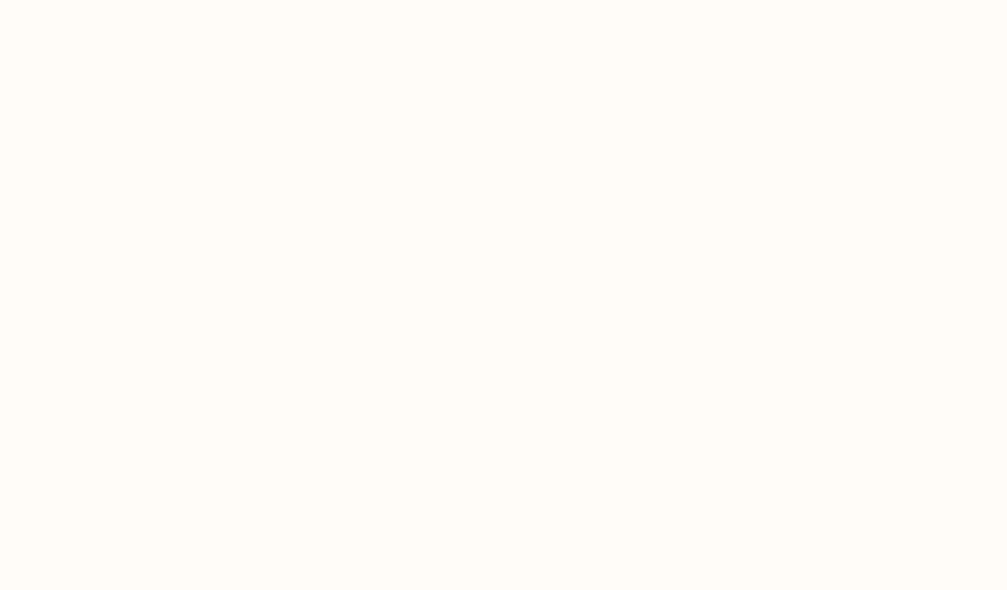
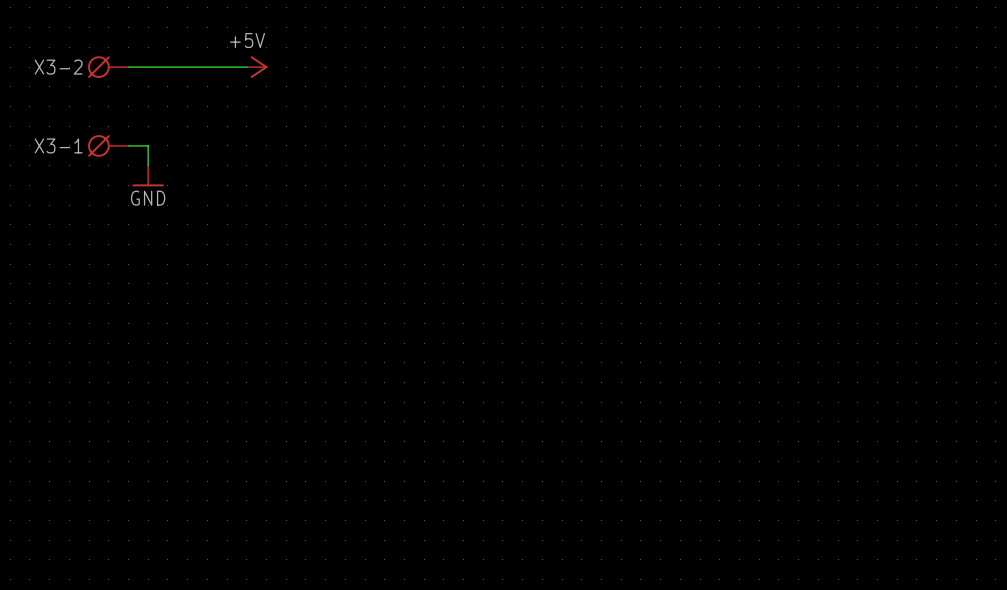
X3-2: none -> (108, 67)
wire: none -> (128, 67) (246, 67)
power symbol: none -> +5V (257, 67)
X3-1: none -> (108, 145)
wire: none -> (128, 145) (148, 145) (148, 165)
power symbol: none -> GND (148, 176)

